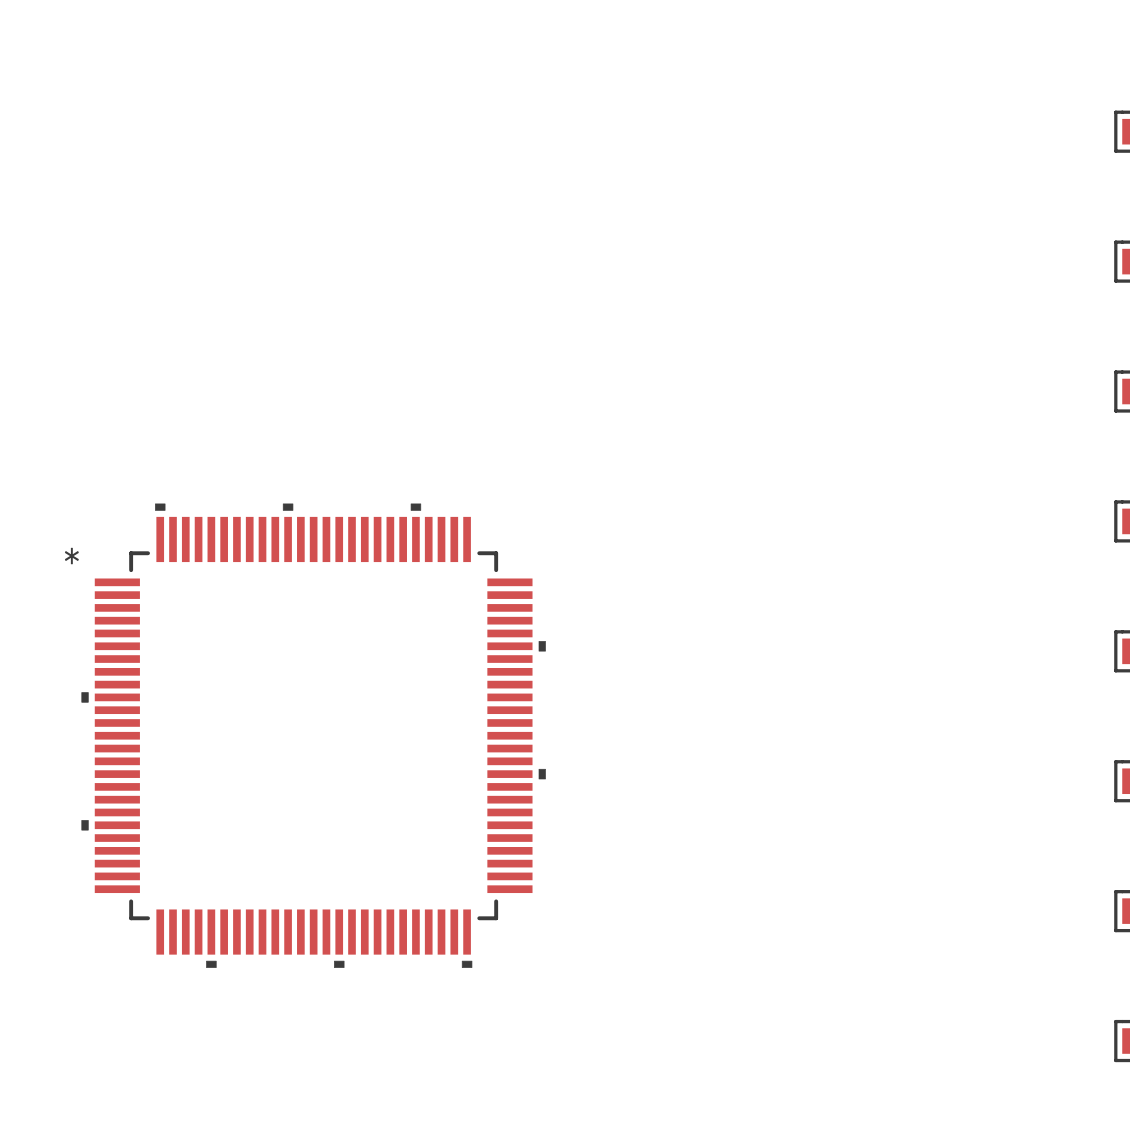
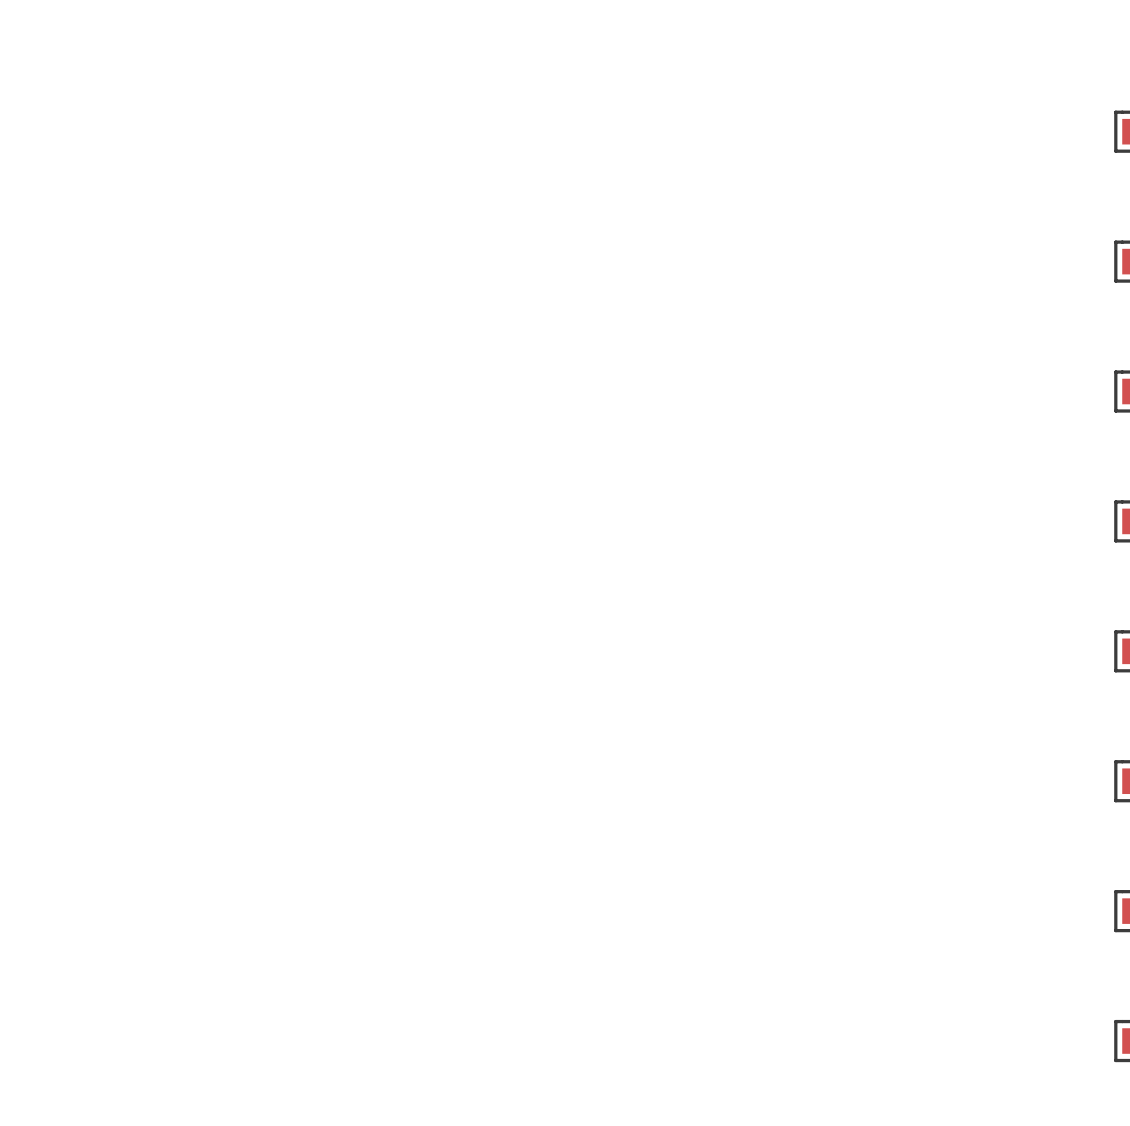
part: (313, 735) -> none

